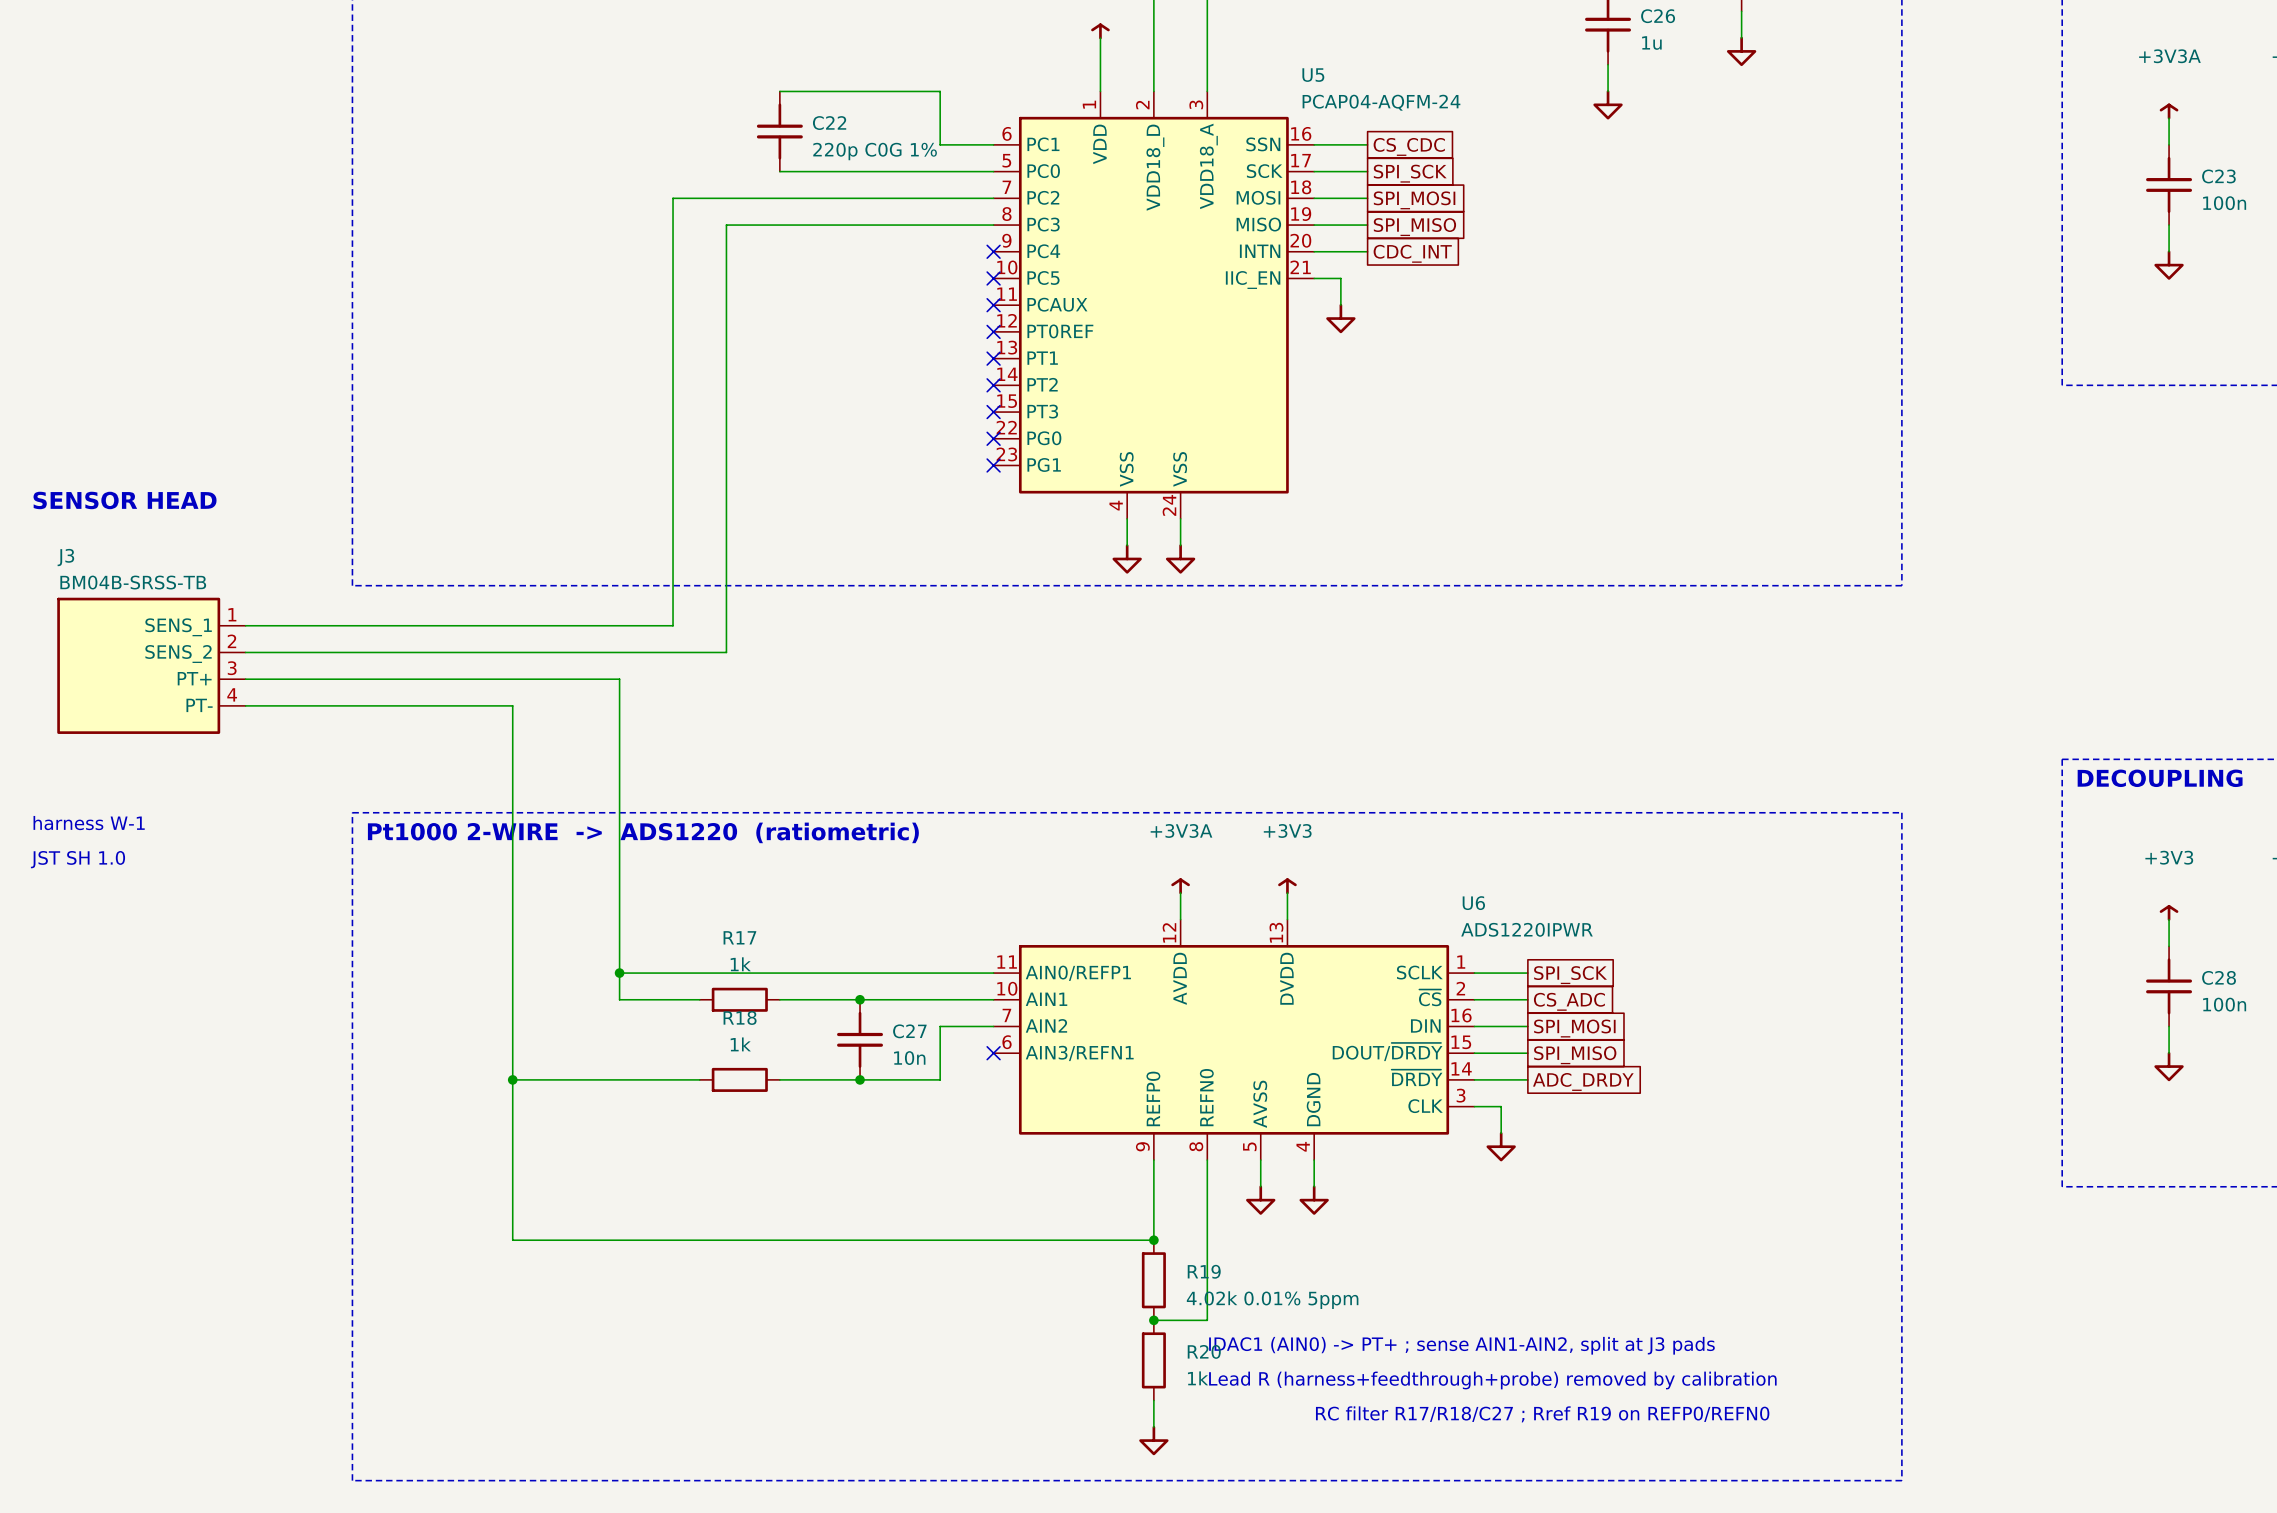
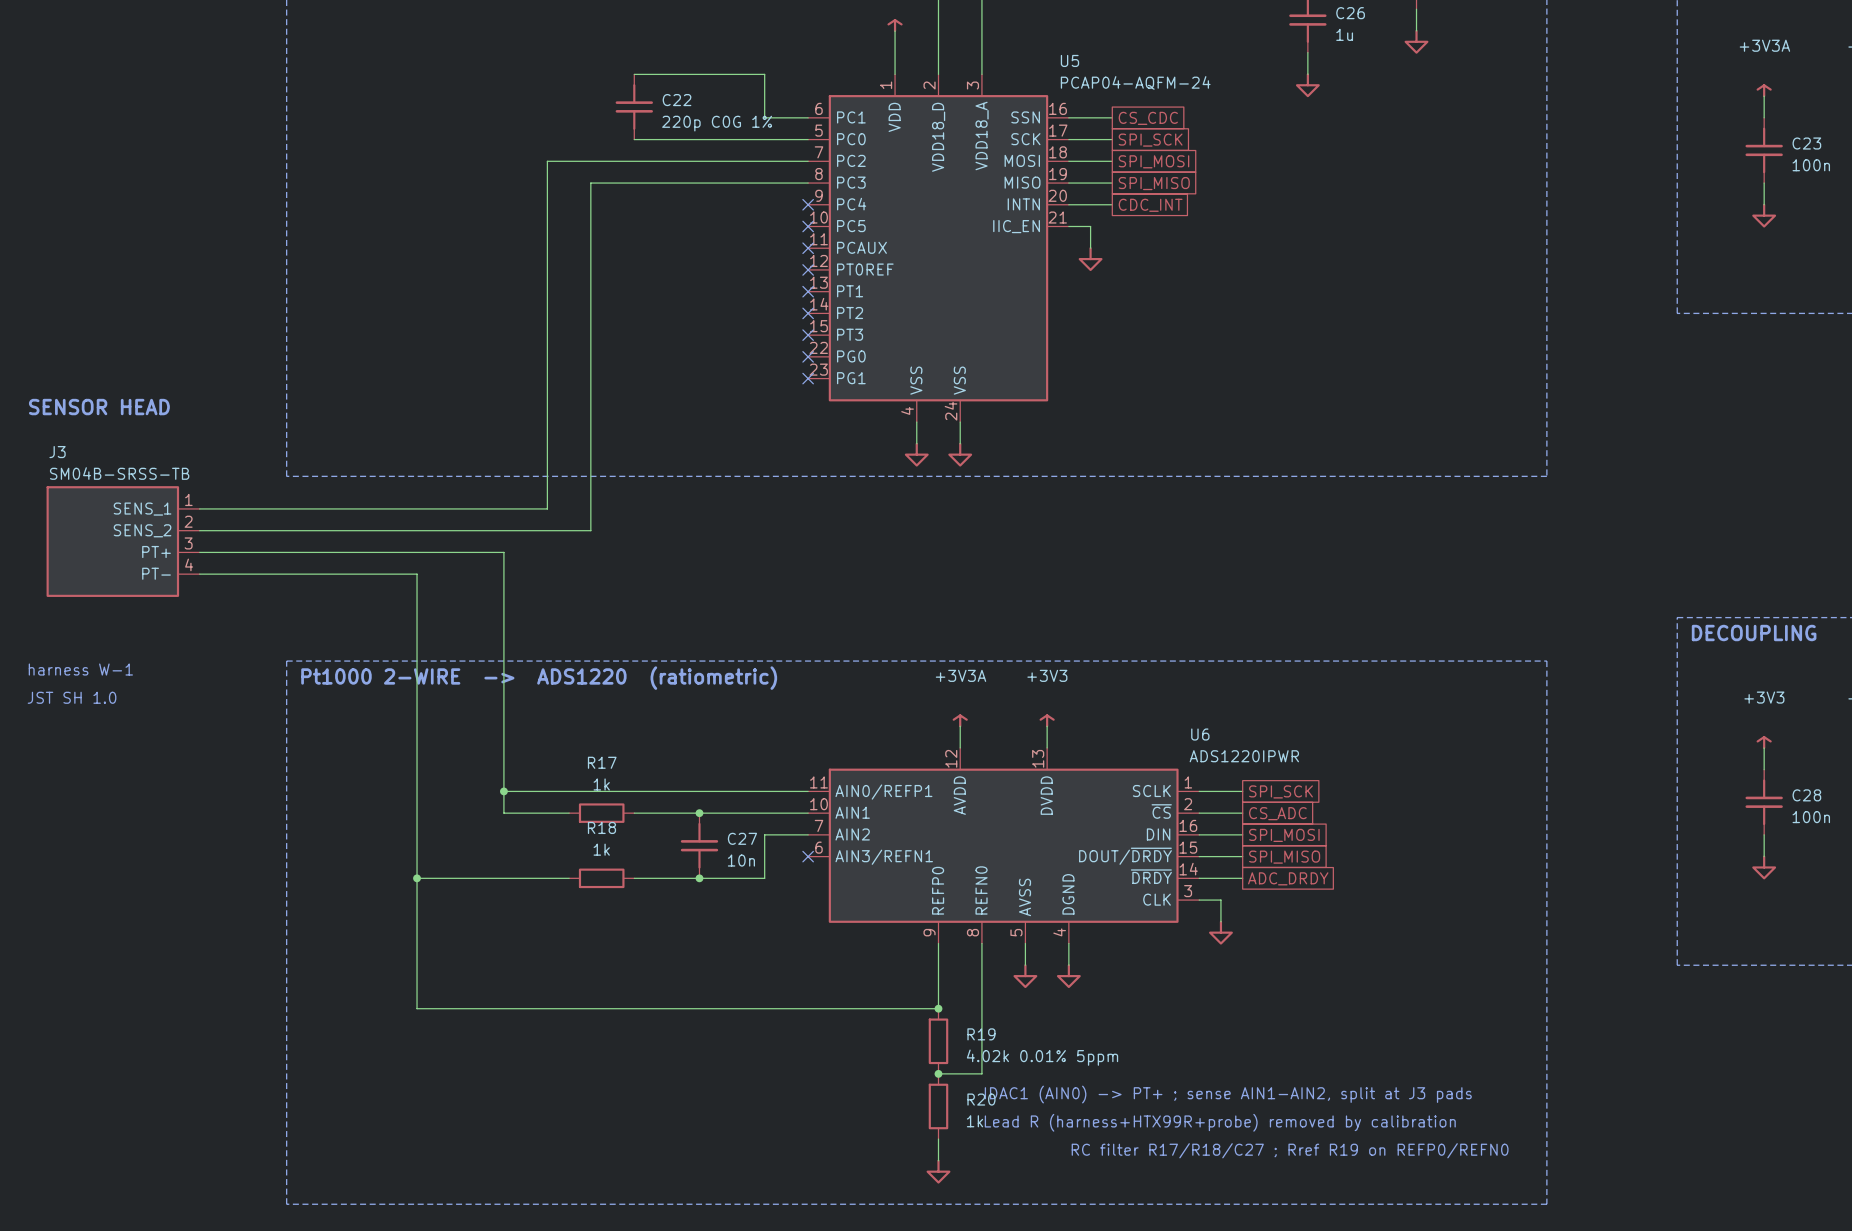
J3 value: BM04B-SRSS-TB (133, 582) -> SM04B-SRSS-TB (119, 473)
text: Lead R (harness+feedthrough+probe) removed by calibration (1492, 1380) -> Lead R (harness+HTX99R+probe) removed by calibration (1220, 1122)

